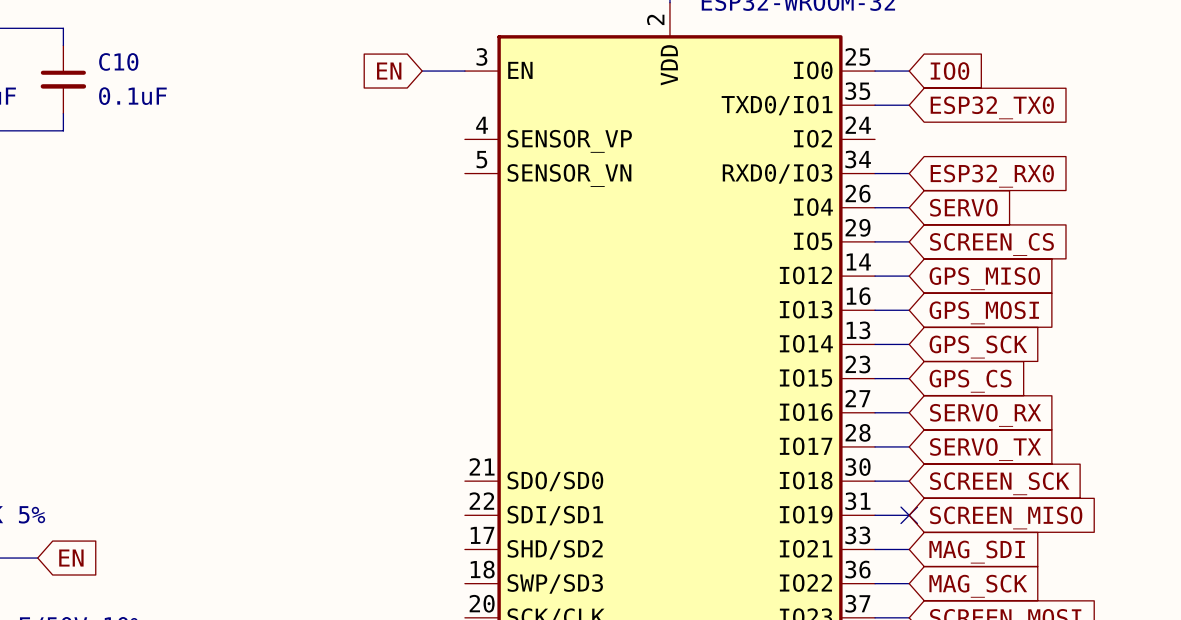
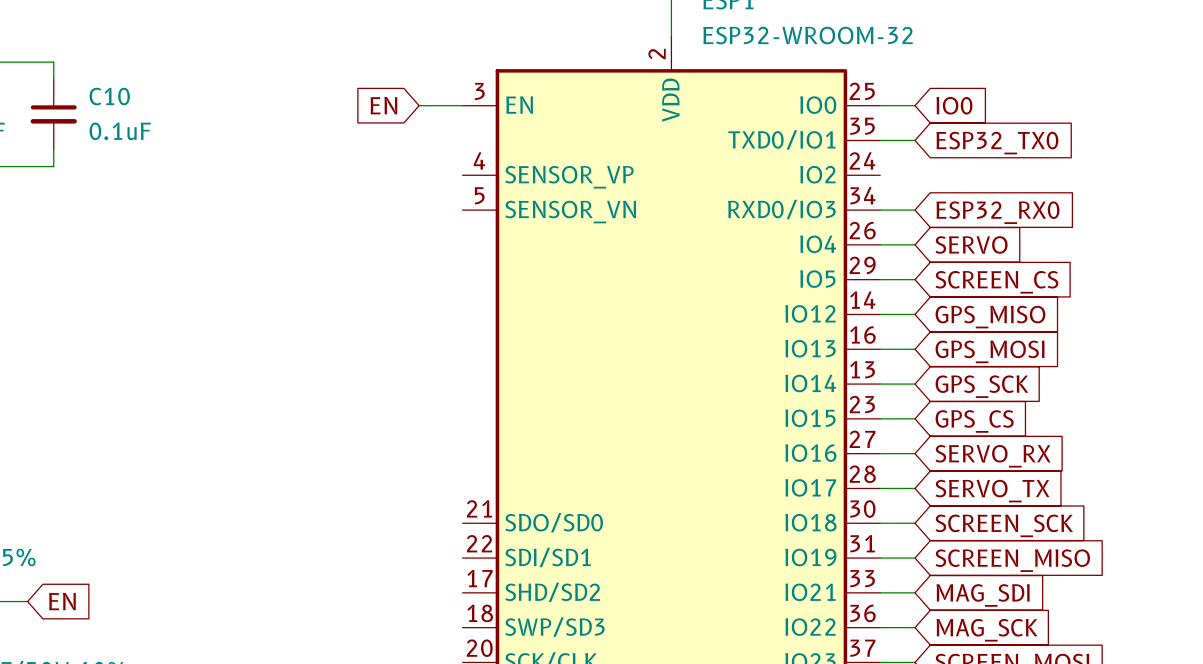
no-connect mark: (909, 515) -> none

